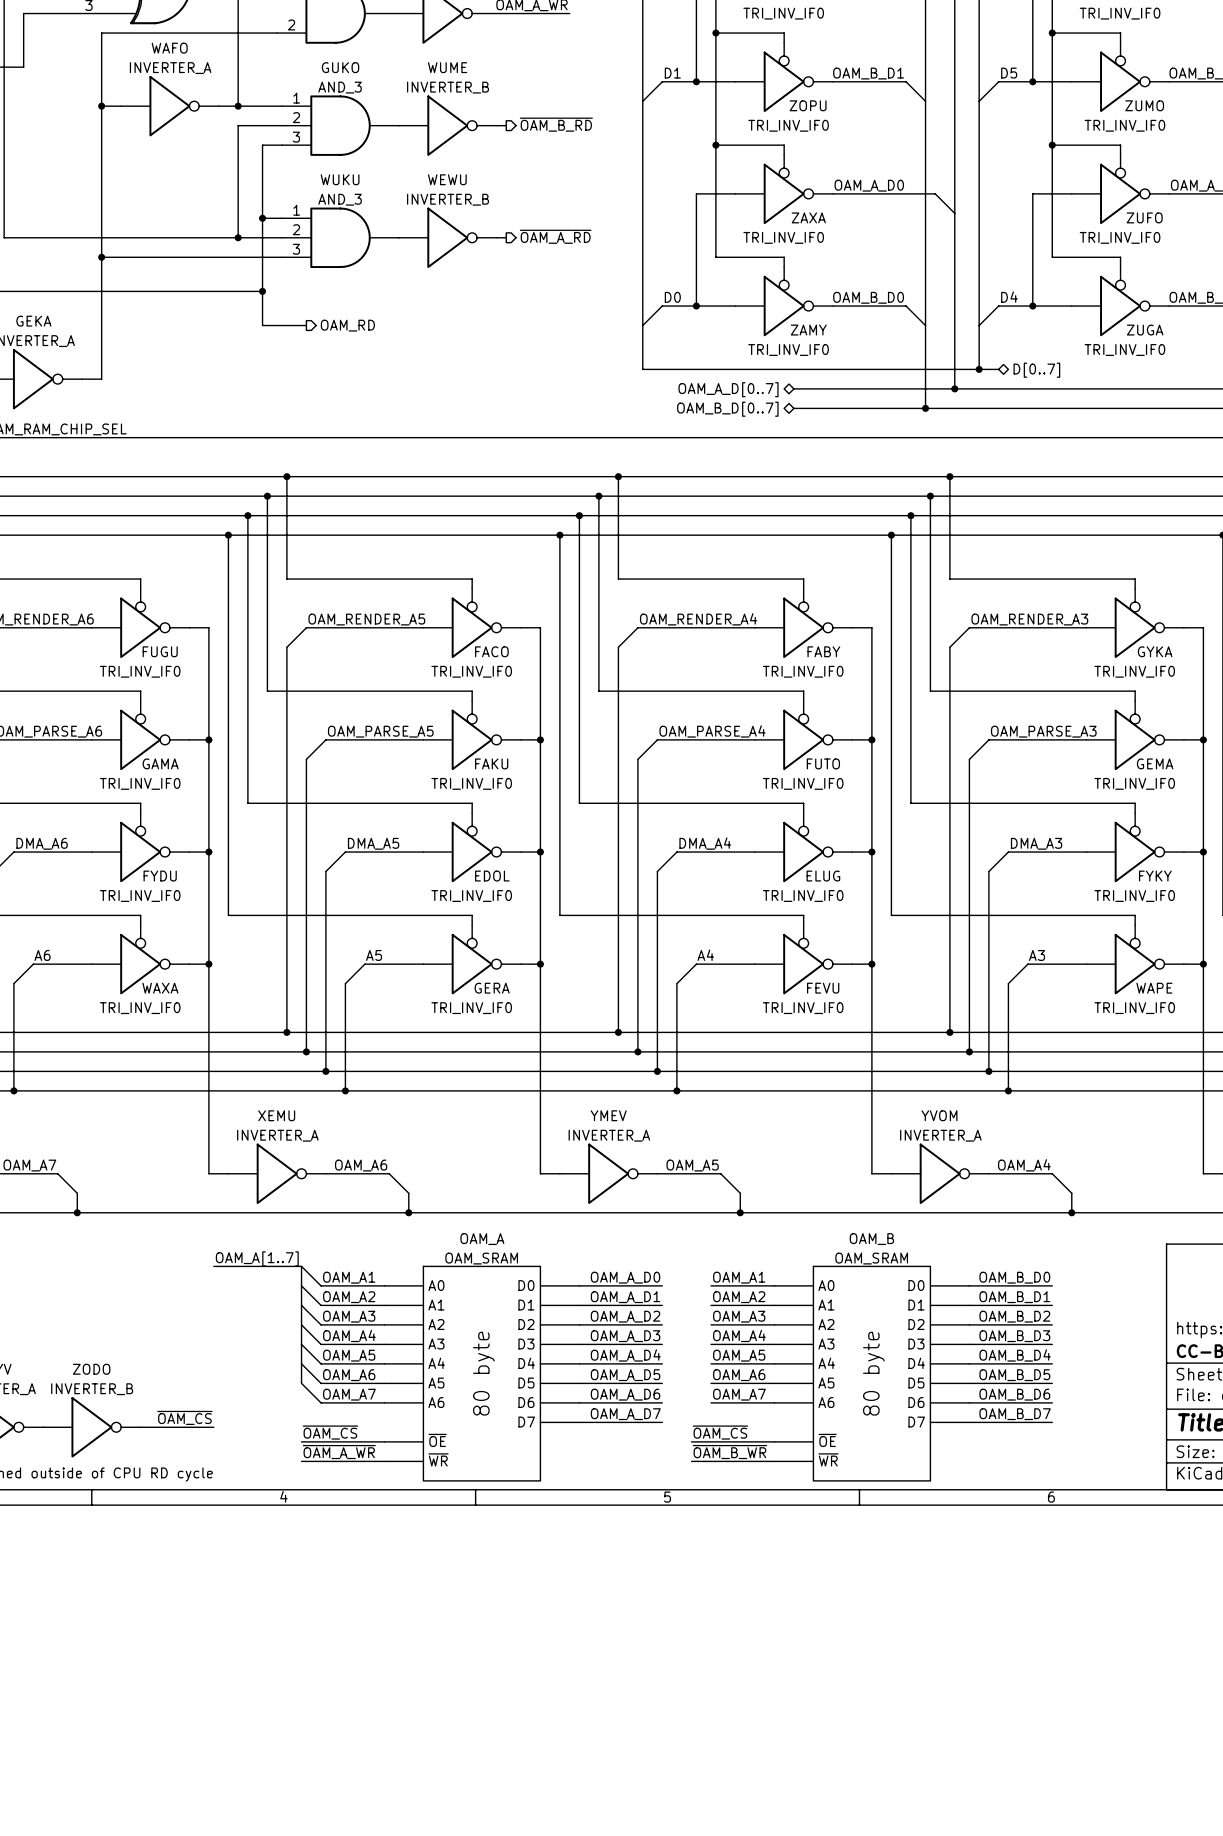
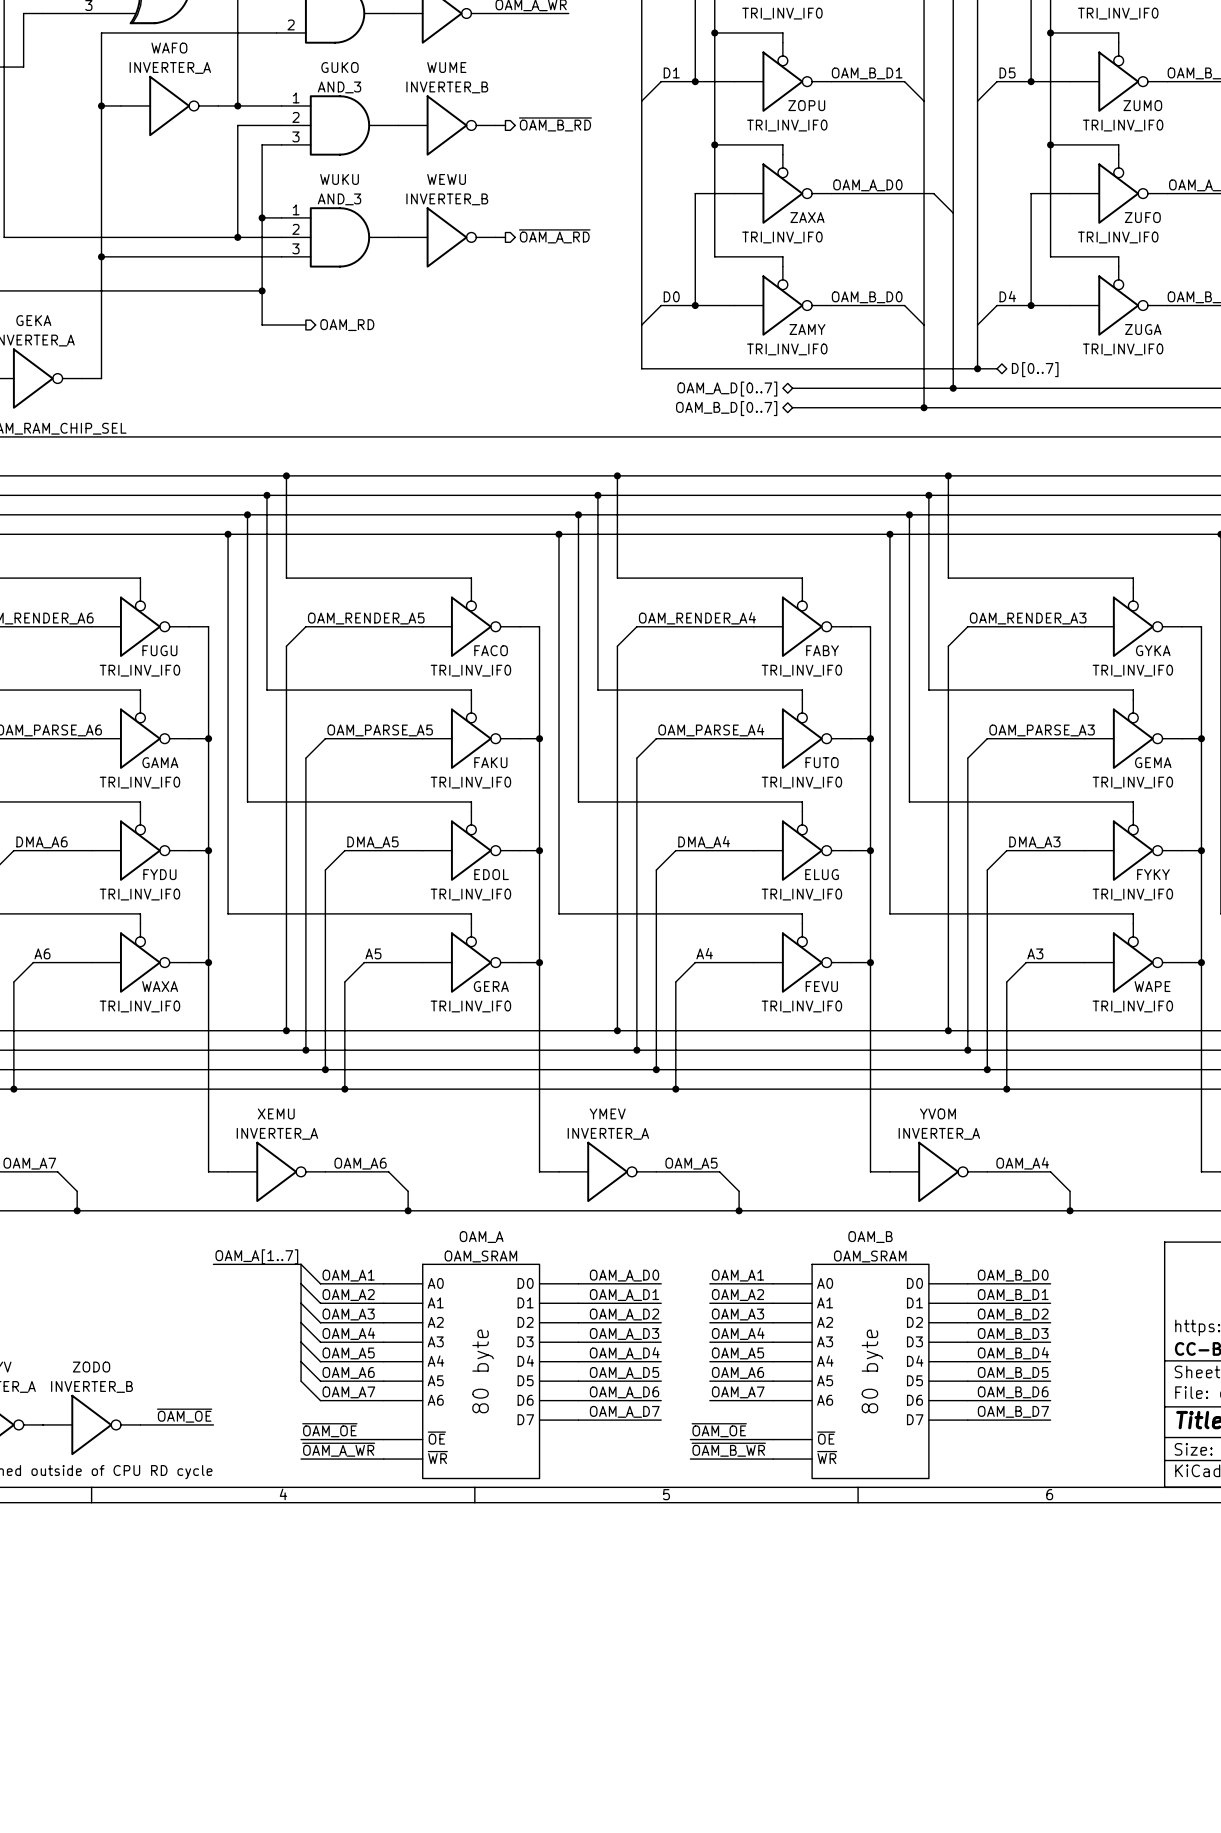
label: ~{OAM_CS} (184, 1417) -> ~{OAM_OE} (184, 1415)
label: ~{OAM_CS} (330, 1432) -> ~{OAM_OE} (329, 1430)
label: ~{OAM_CS} (720, 1432) -> ~{OAM_OE} (719, 1430)

